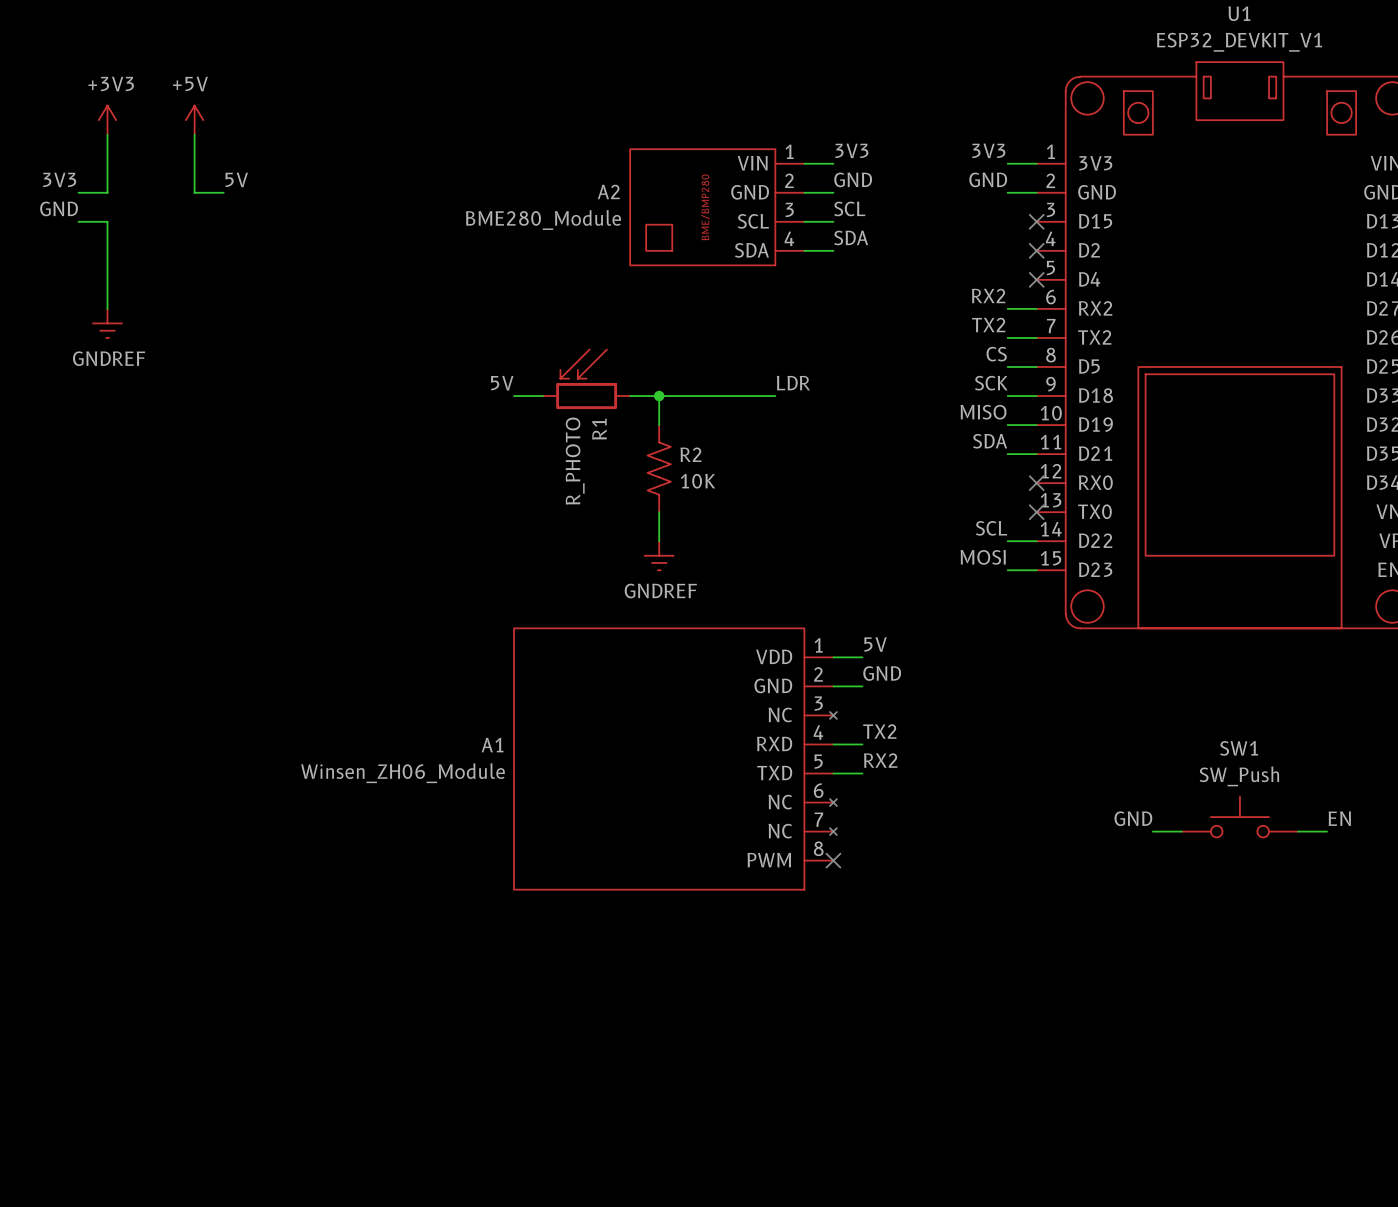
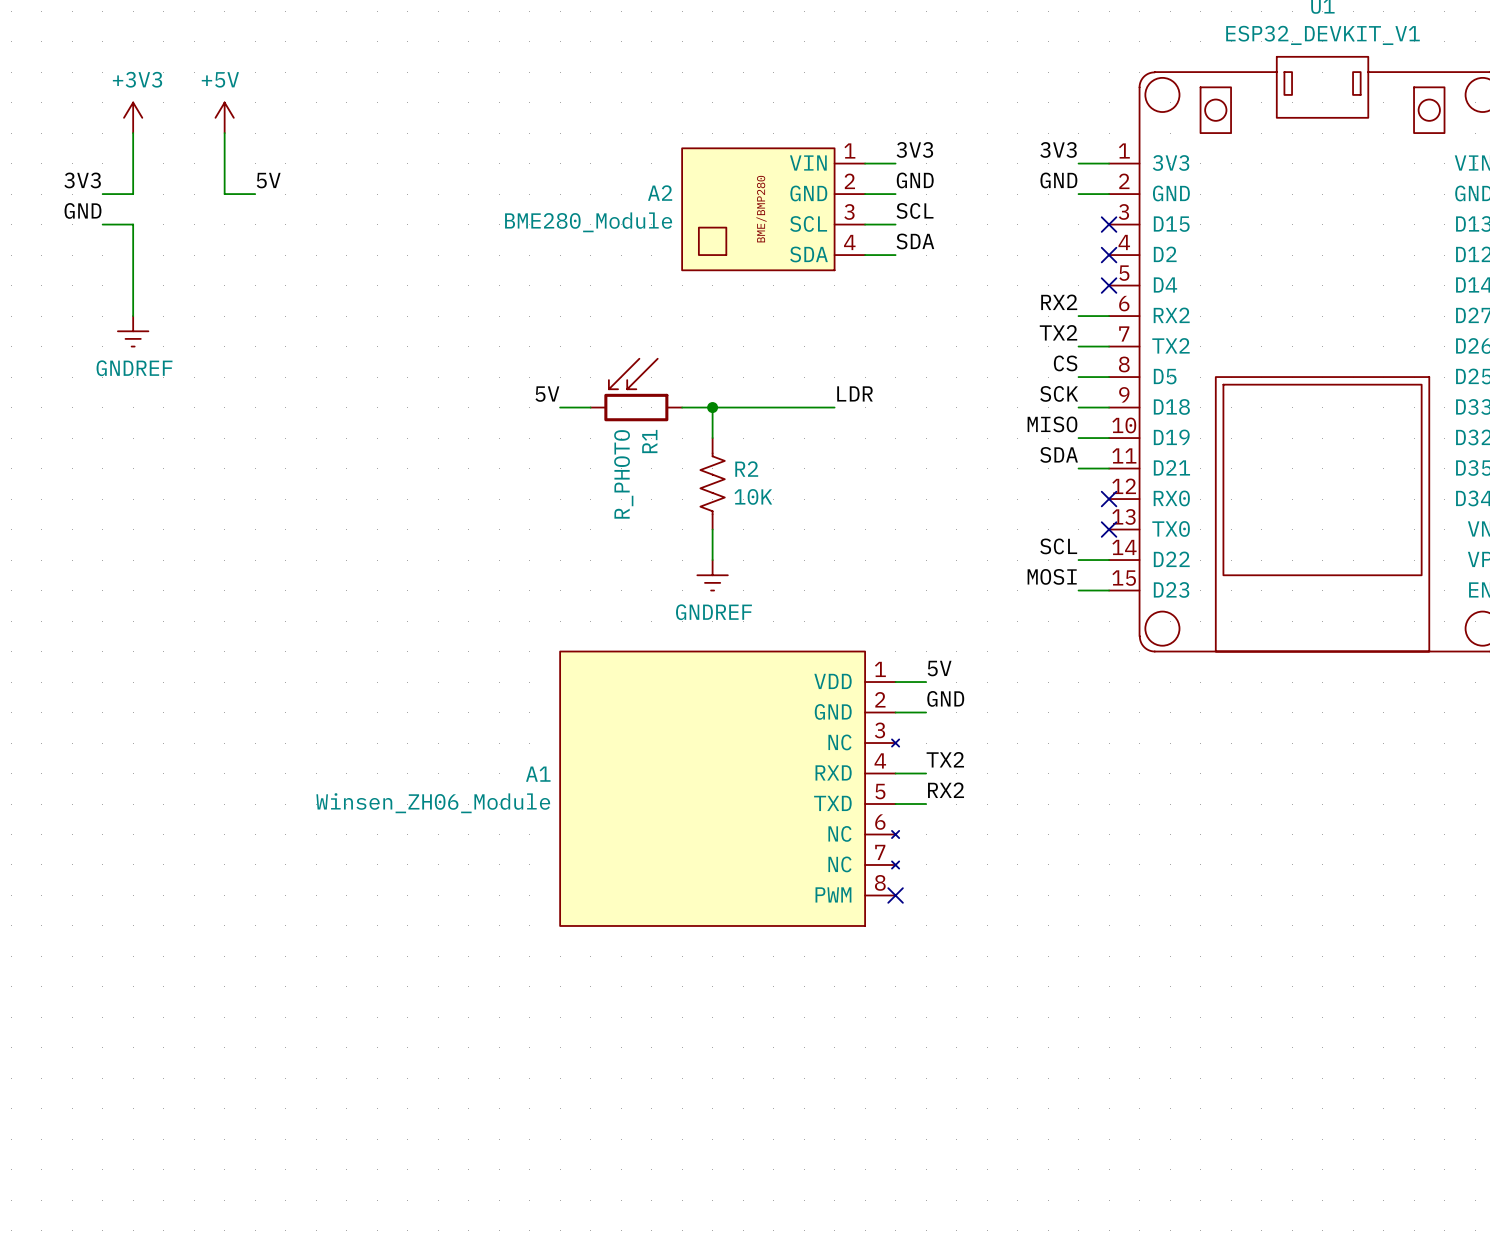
SW1: SW_Push (1239, 817) -> none
label: GND (1133, 818) -> none
label: EN (1339, 818) -> none
wire: (1152, 831) (1181, 831) -> none
wire: (1298, 831) (1327, 831) -> none

